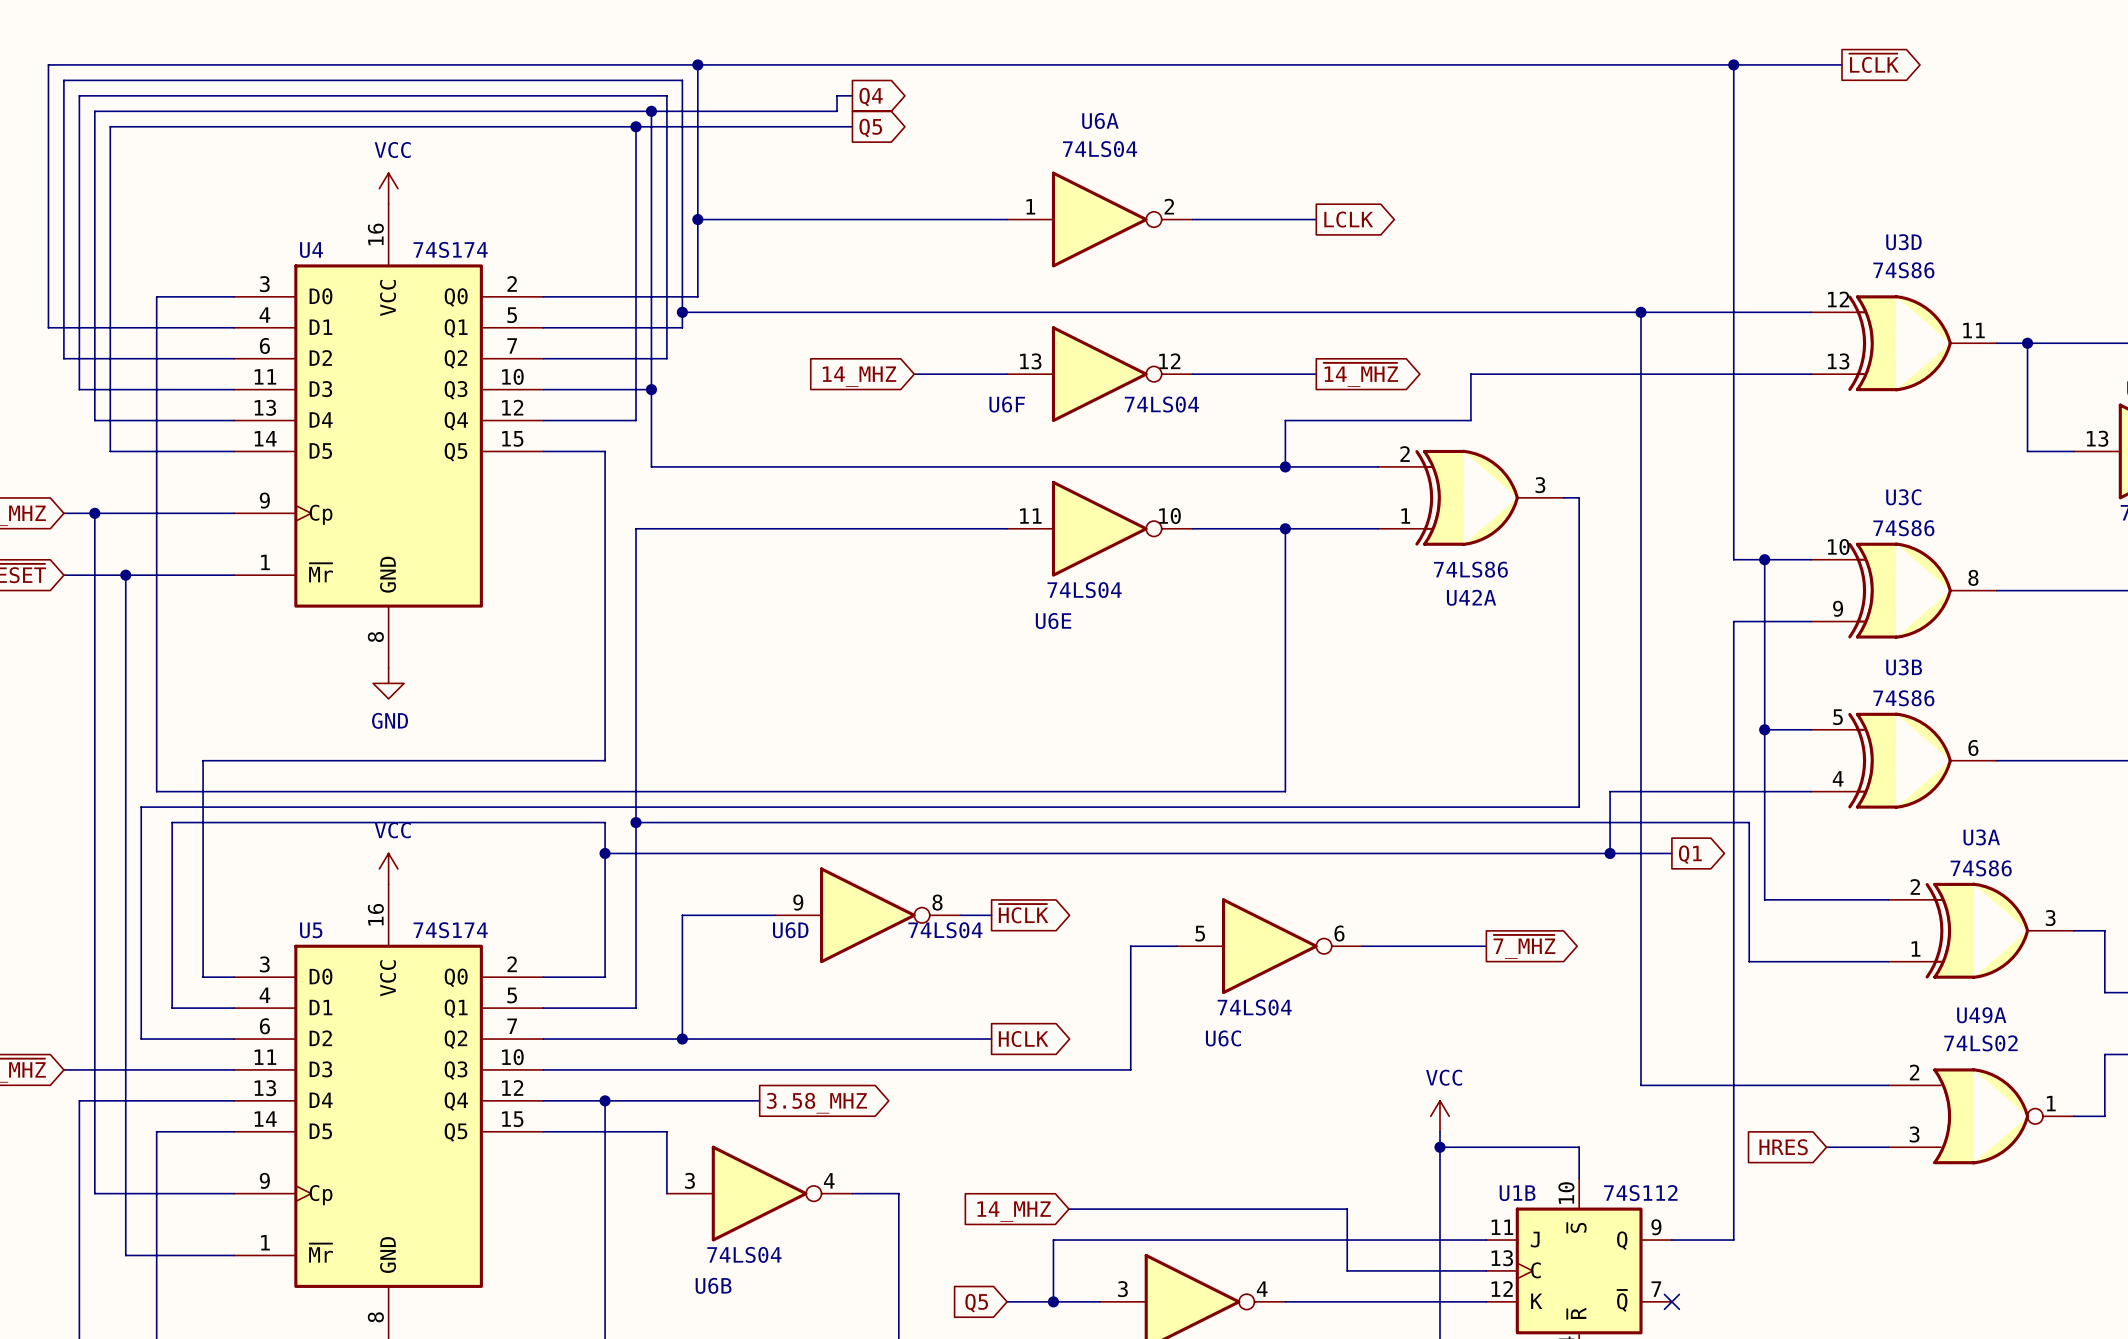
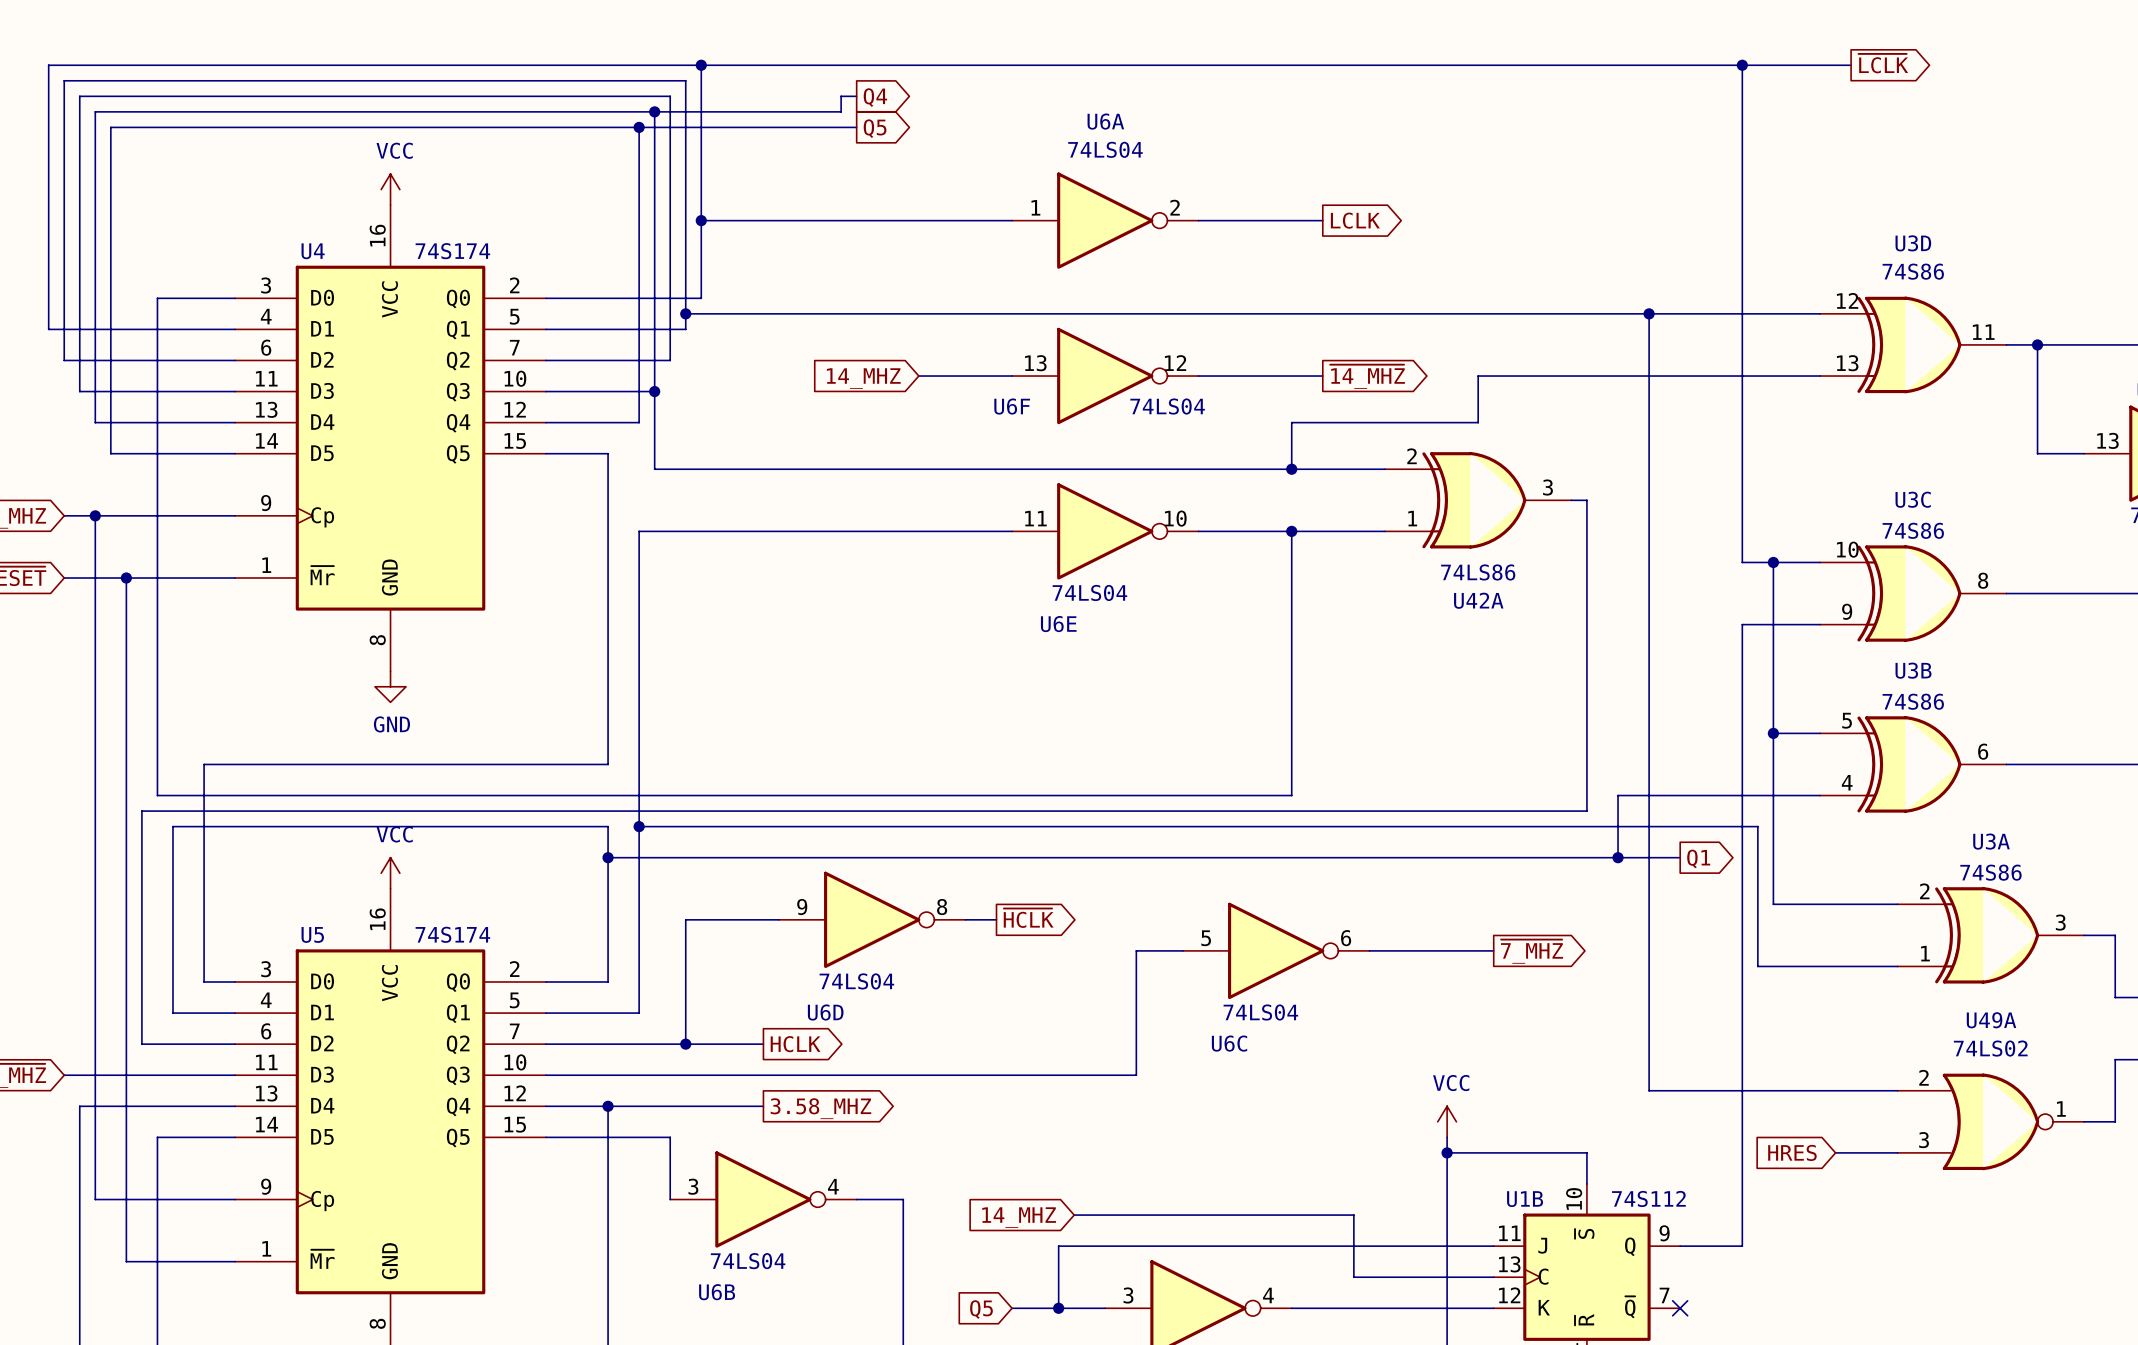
U6D name position: U6D (790, 930) -> U6D (825, 1012)
U6D value position: 74LS04 (945, 930) -> 74LS04 (856, 981)
wire: (759, 1039) (991, 1039) -> none
global label position: HCLK (1023, 1039) -> HCLK (795, 1044)

